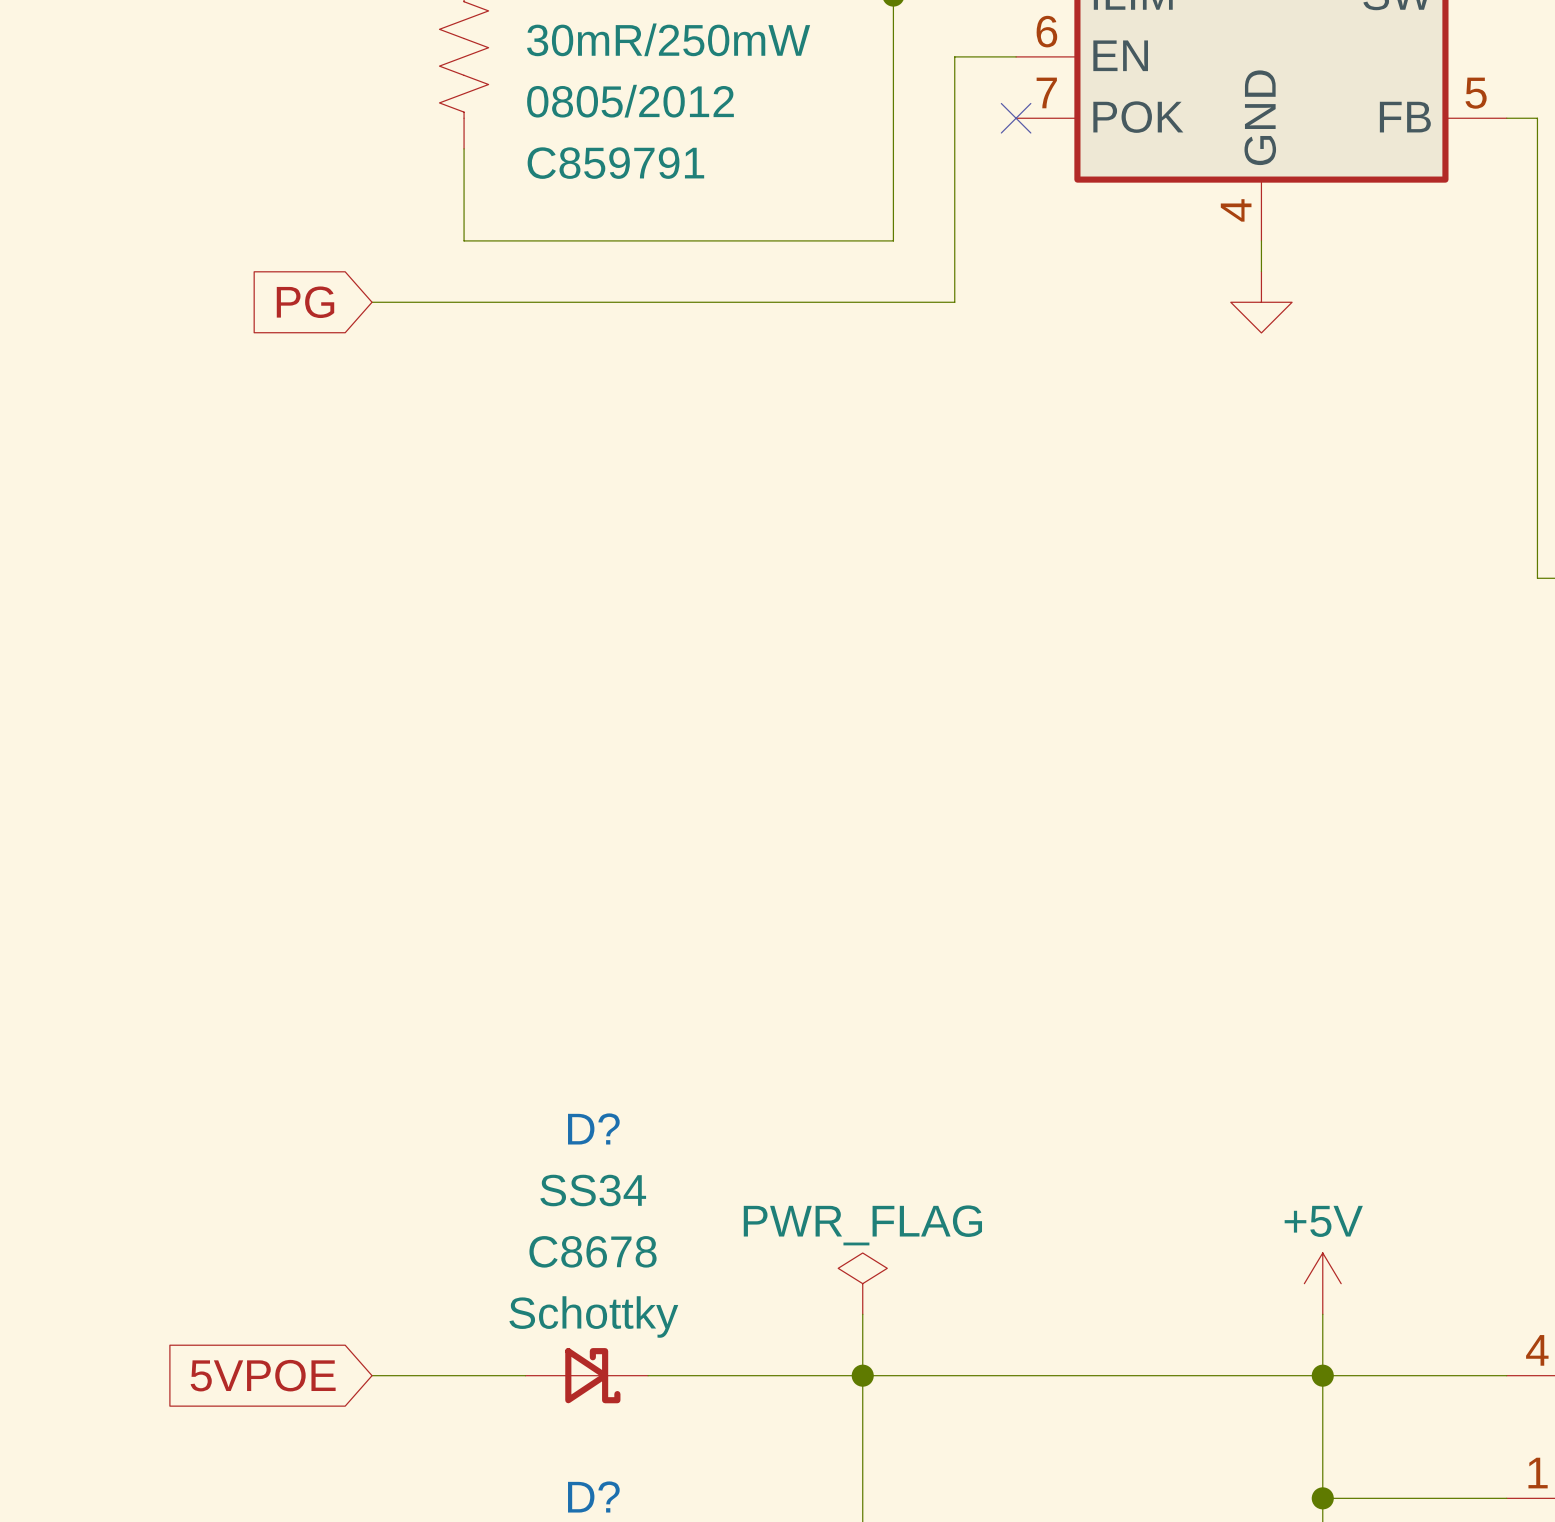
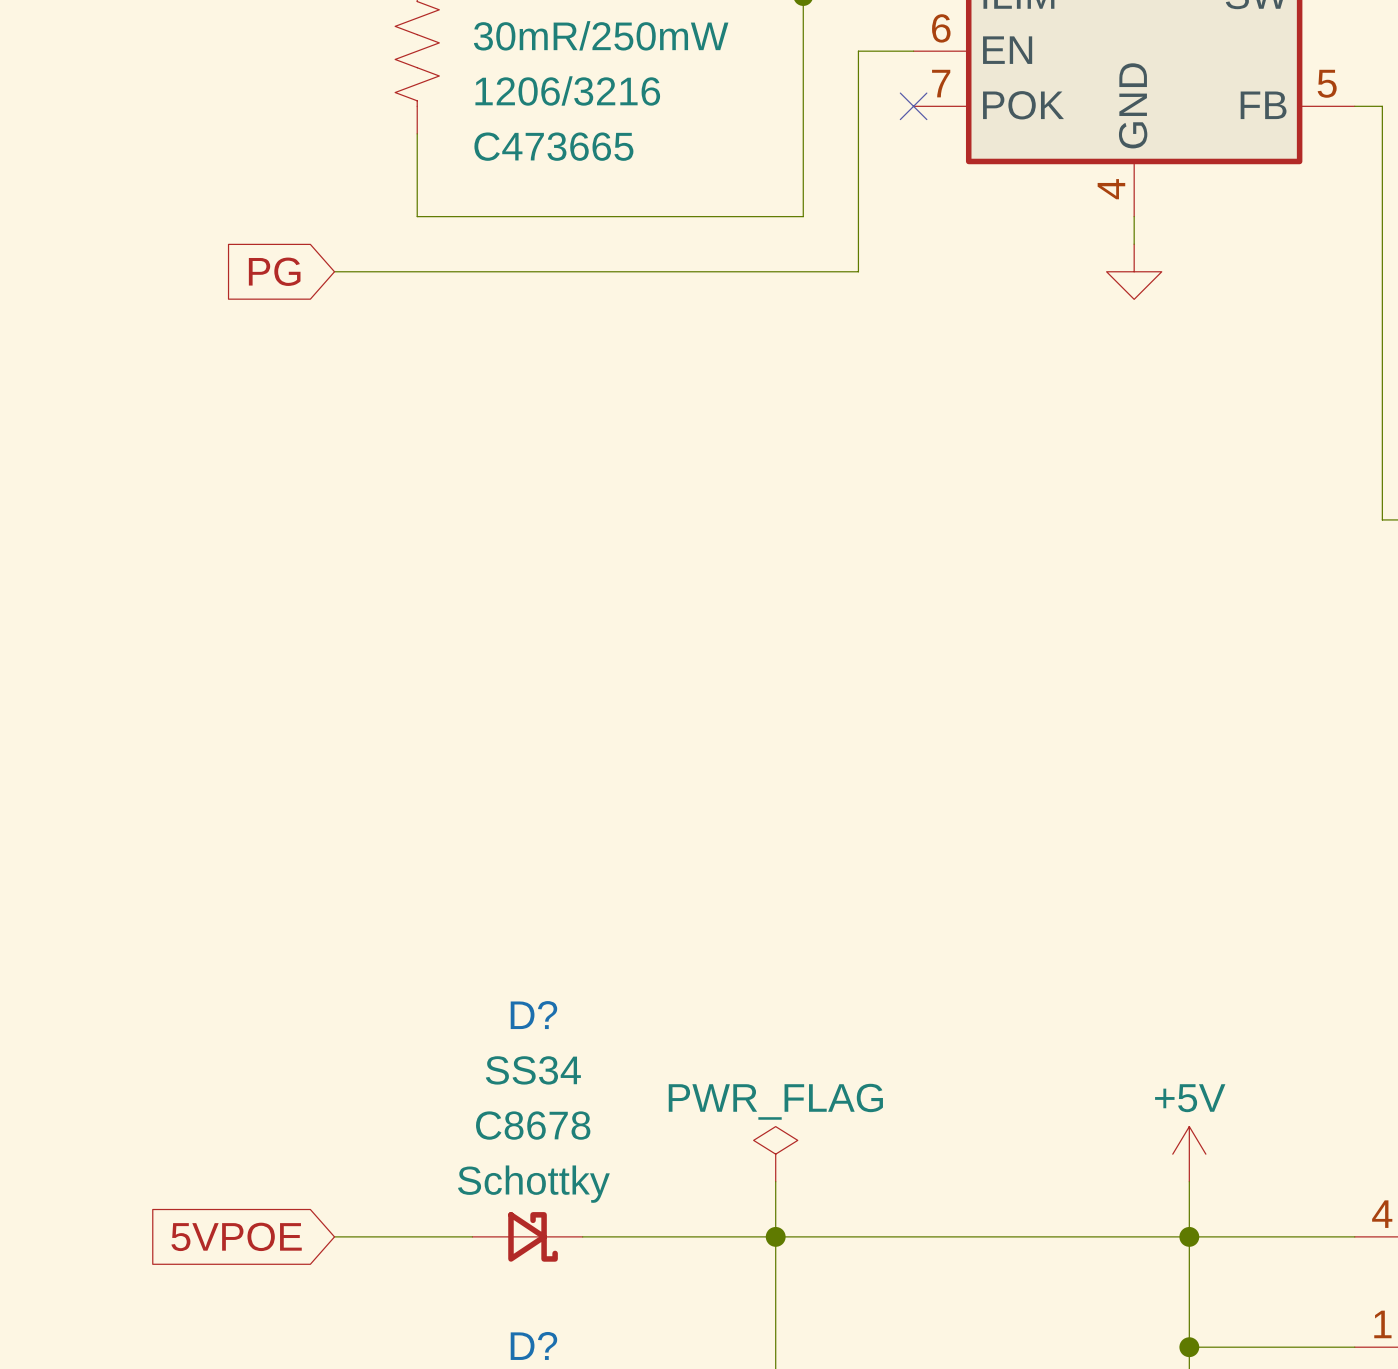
part text: 0805/2012 (630, 101) -> 1206/3216 (567, 90)
part text: C859791 (615, 163) -> C473665 (553, 146)

